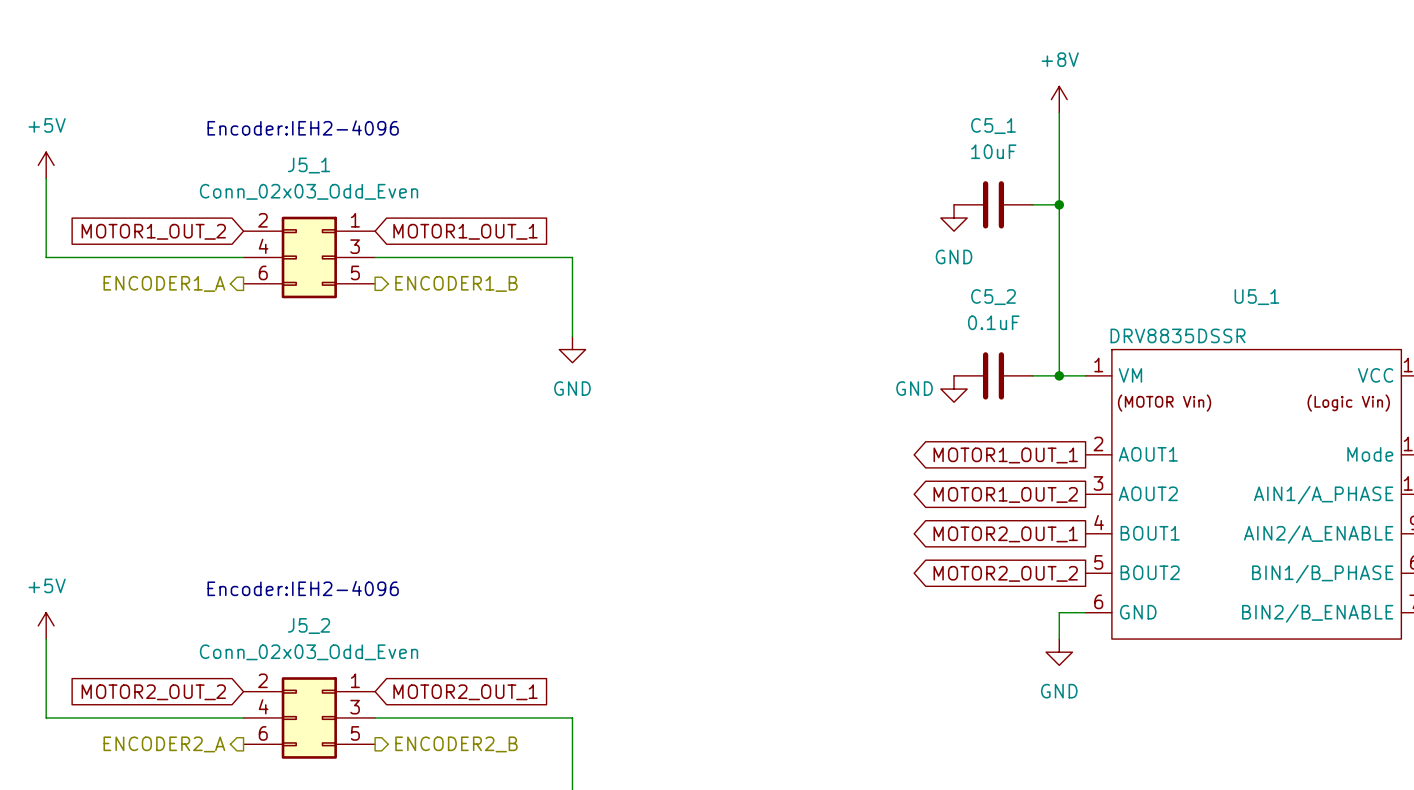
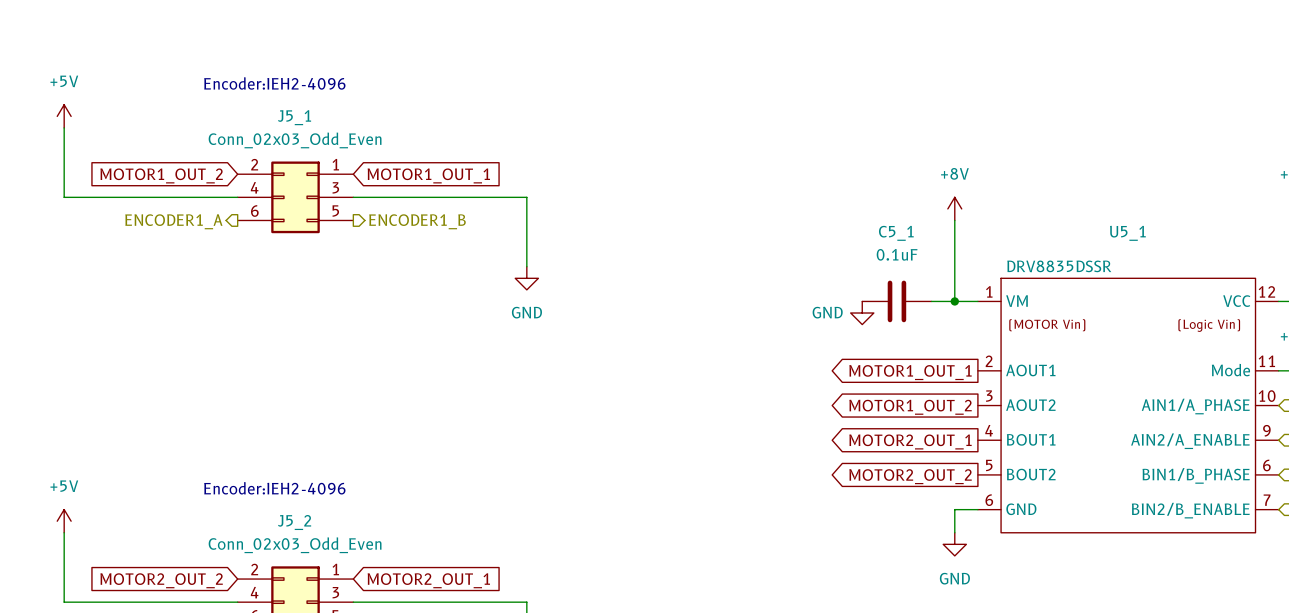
power symbol position: +8V (1059, 99) -> +8V (954, 208)
wire: (1059, 112) (1059, 283) -> none
C5_1: 10uF (993, 204) -> none
wire: (1032, 204) (1059, 204) -> none
junction: (1059, 204) -> none
power symbol: GND (954, 218) -> none
C5_2 name: C5_2 (993, 297) -> C5_1 (896, 233)

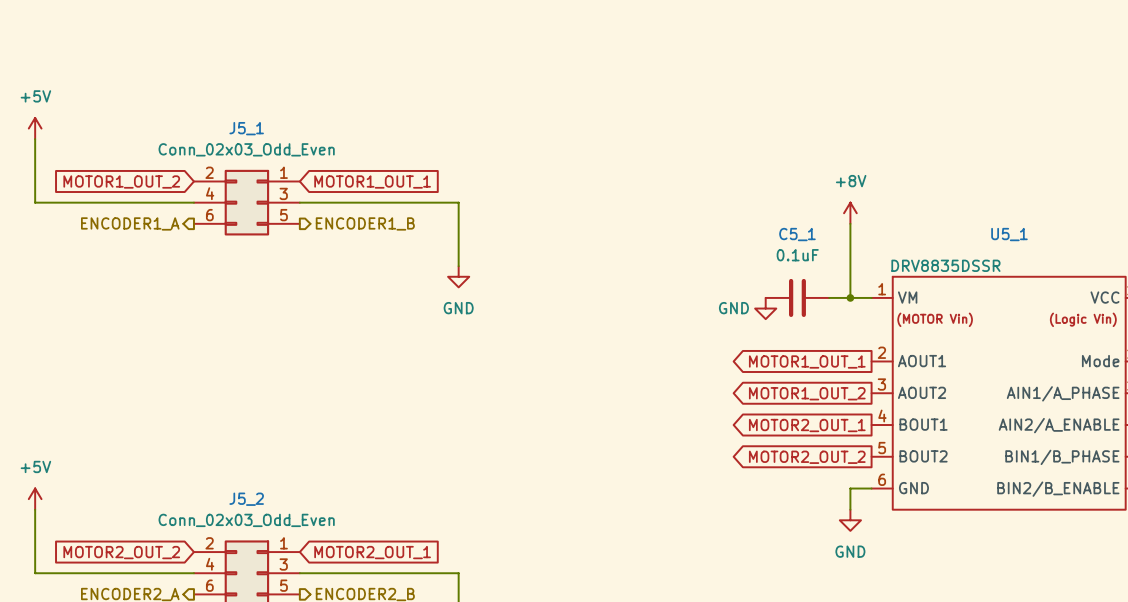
text: Encoder:IEH2-4096 (274, 83) -> none
text: Encoder:IEH2-4096 (274, 488) -> none

